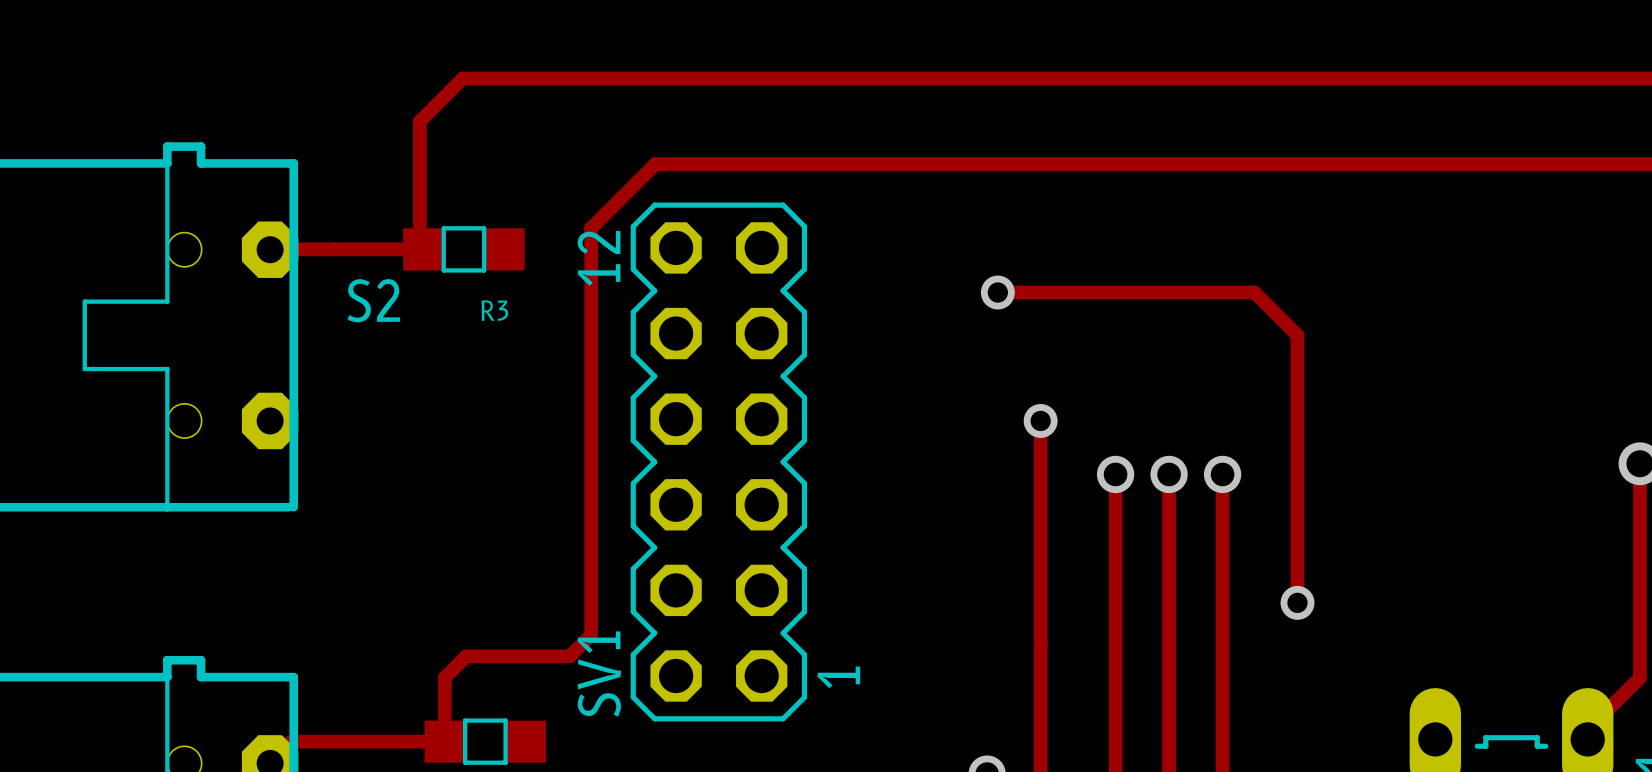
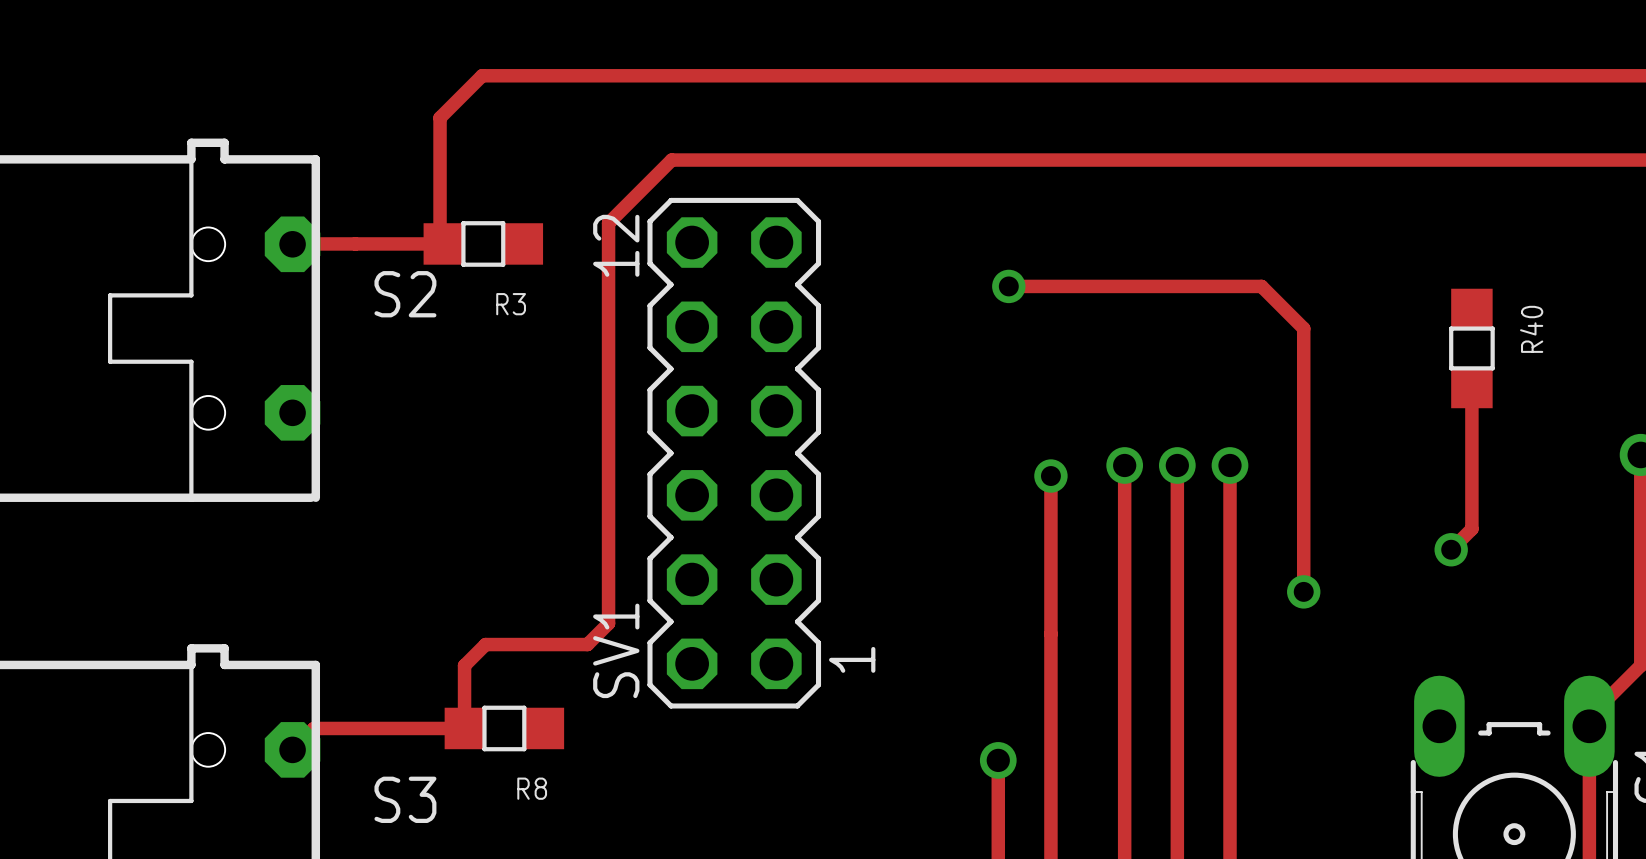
R40: none -> (1471, 348)
track: none -> (1471, 388) (1471, 529) (1451, 549)
track: (1040, 420) (1040, 485) -> none
via position: (1040, 420) -> (1050, 476)
via: none -> (1451, 549)

